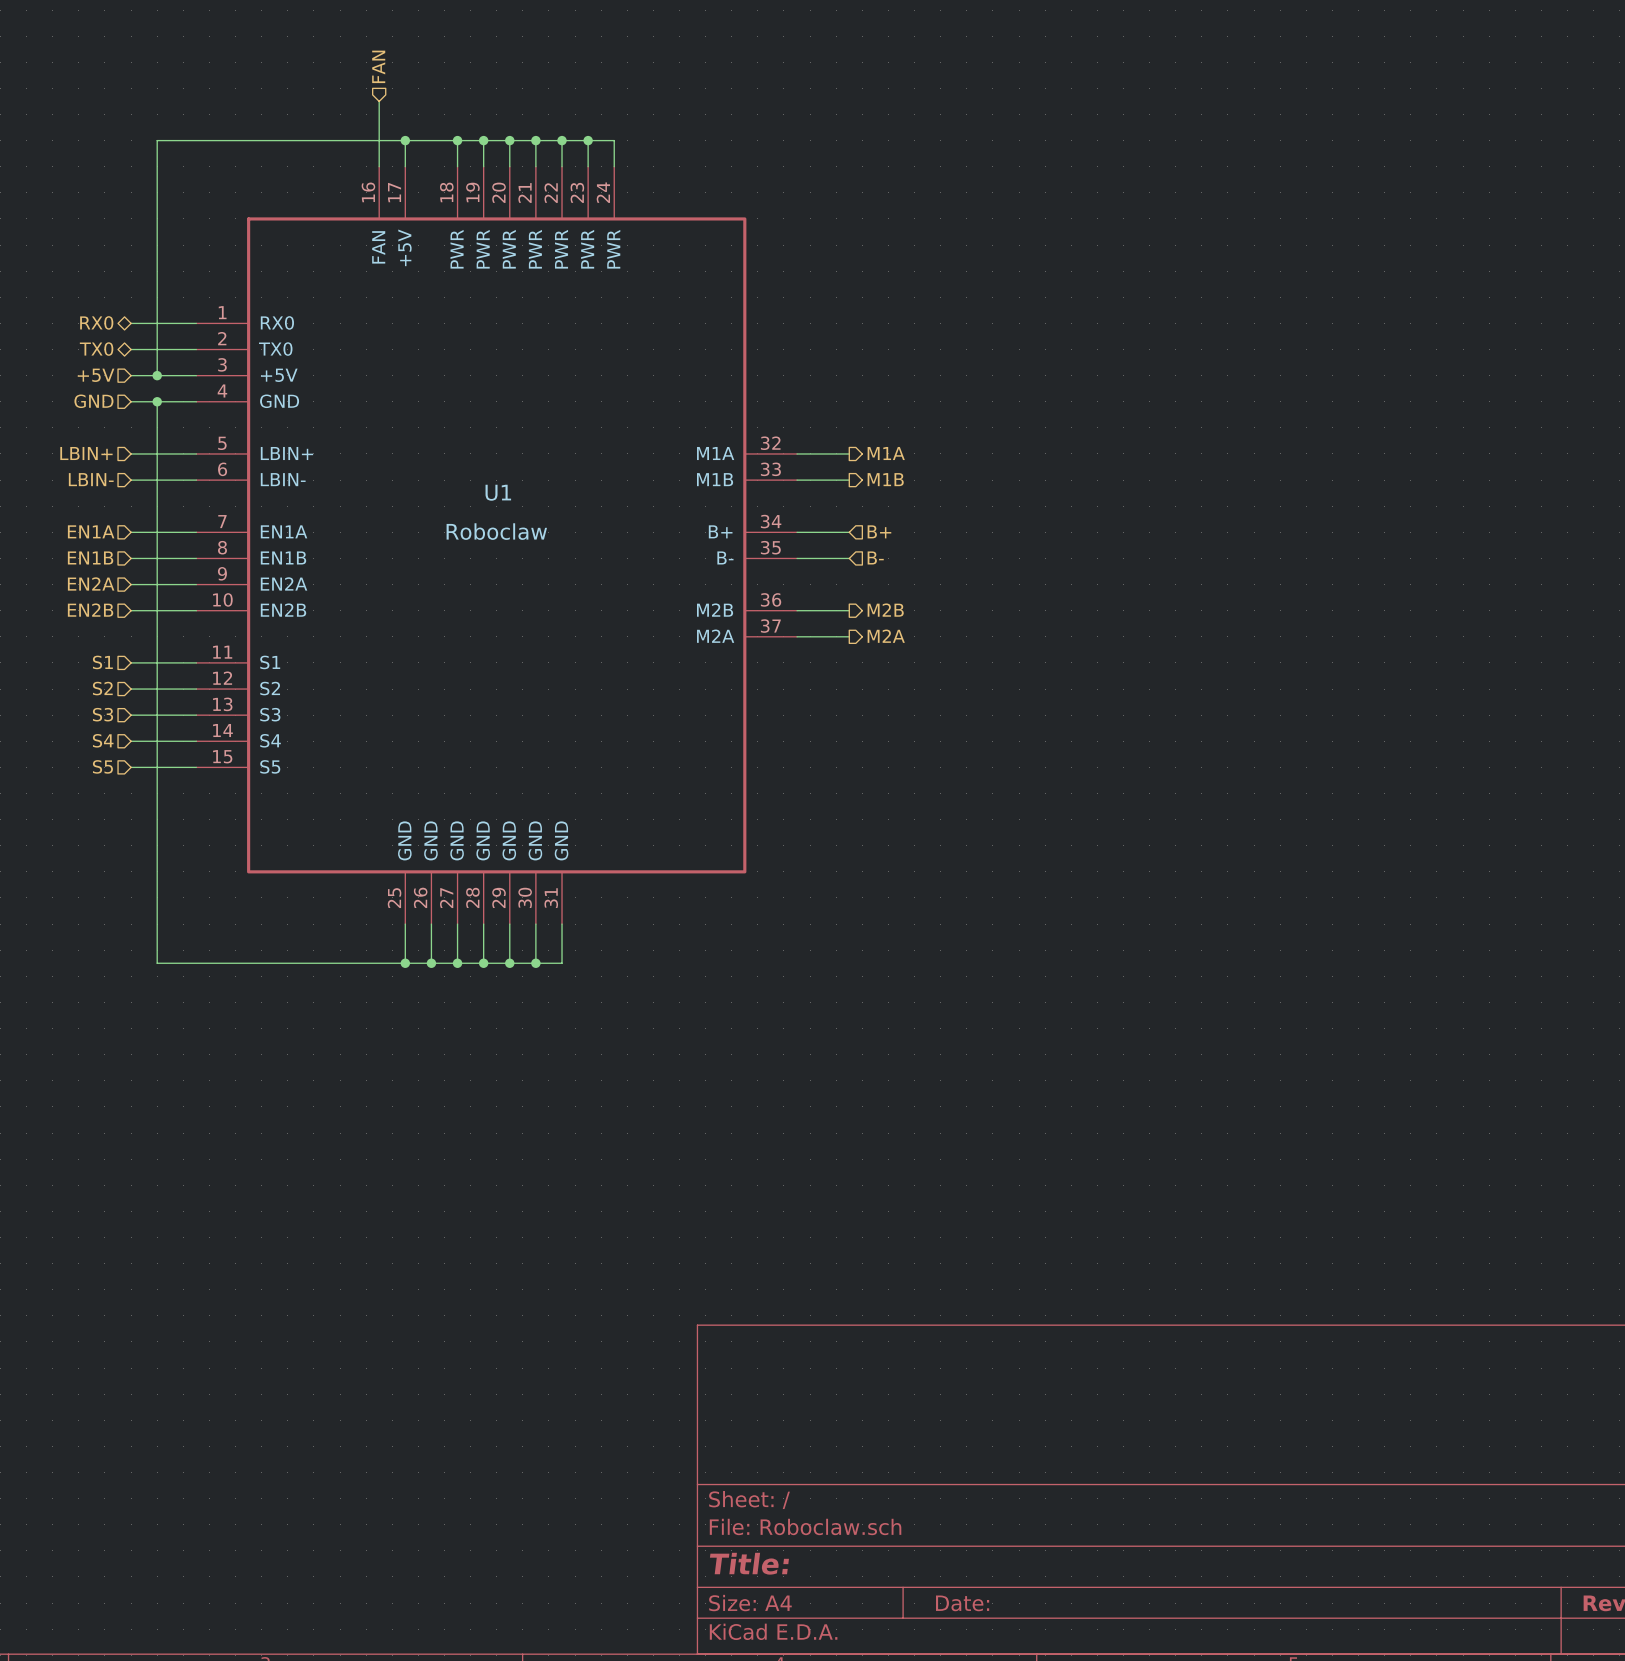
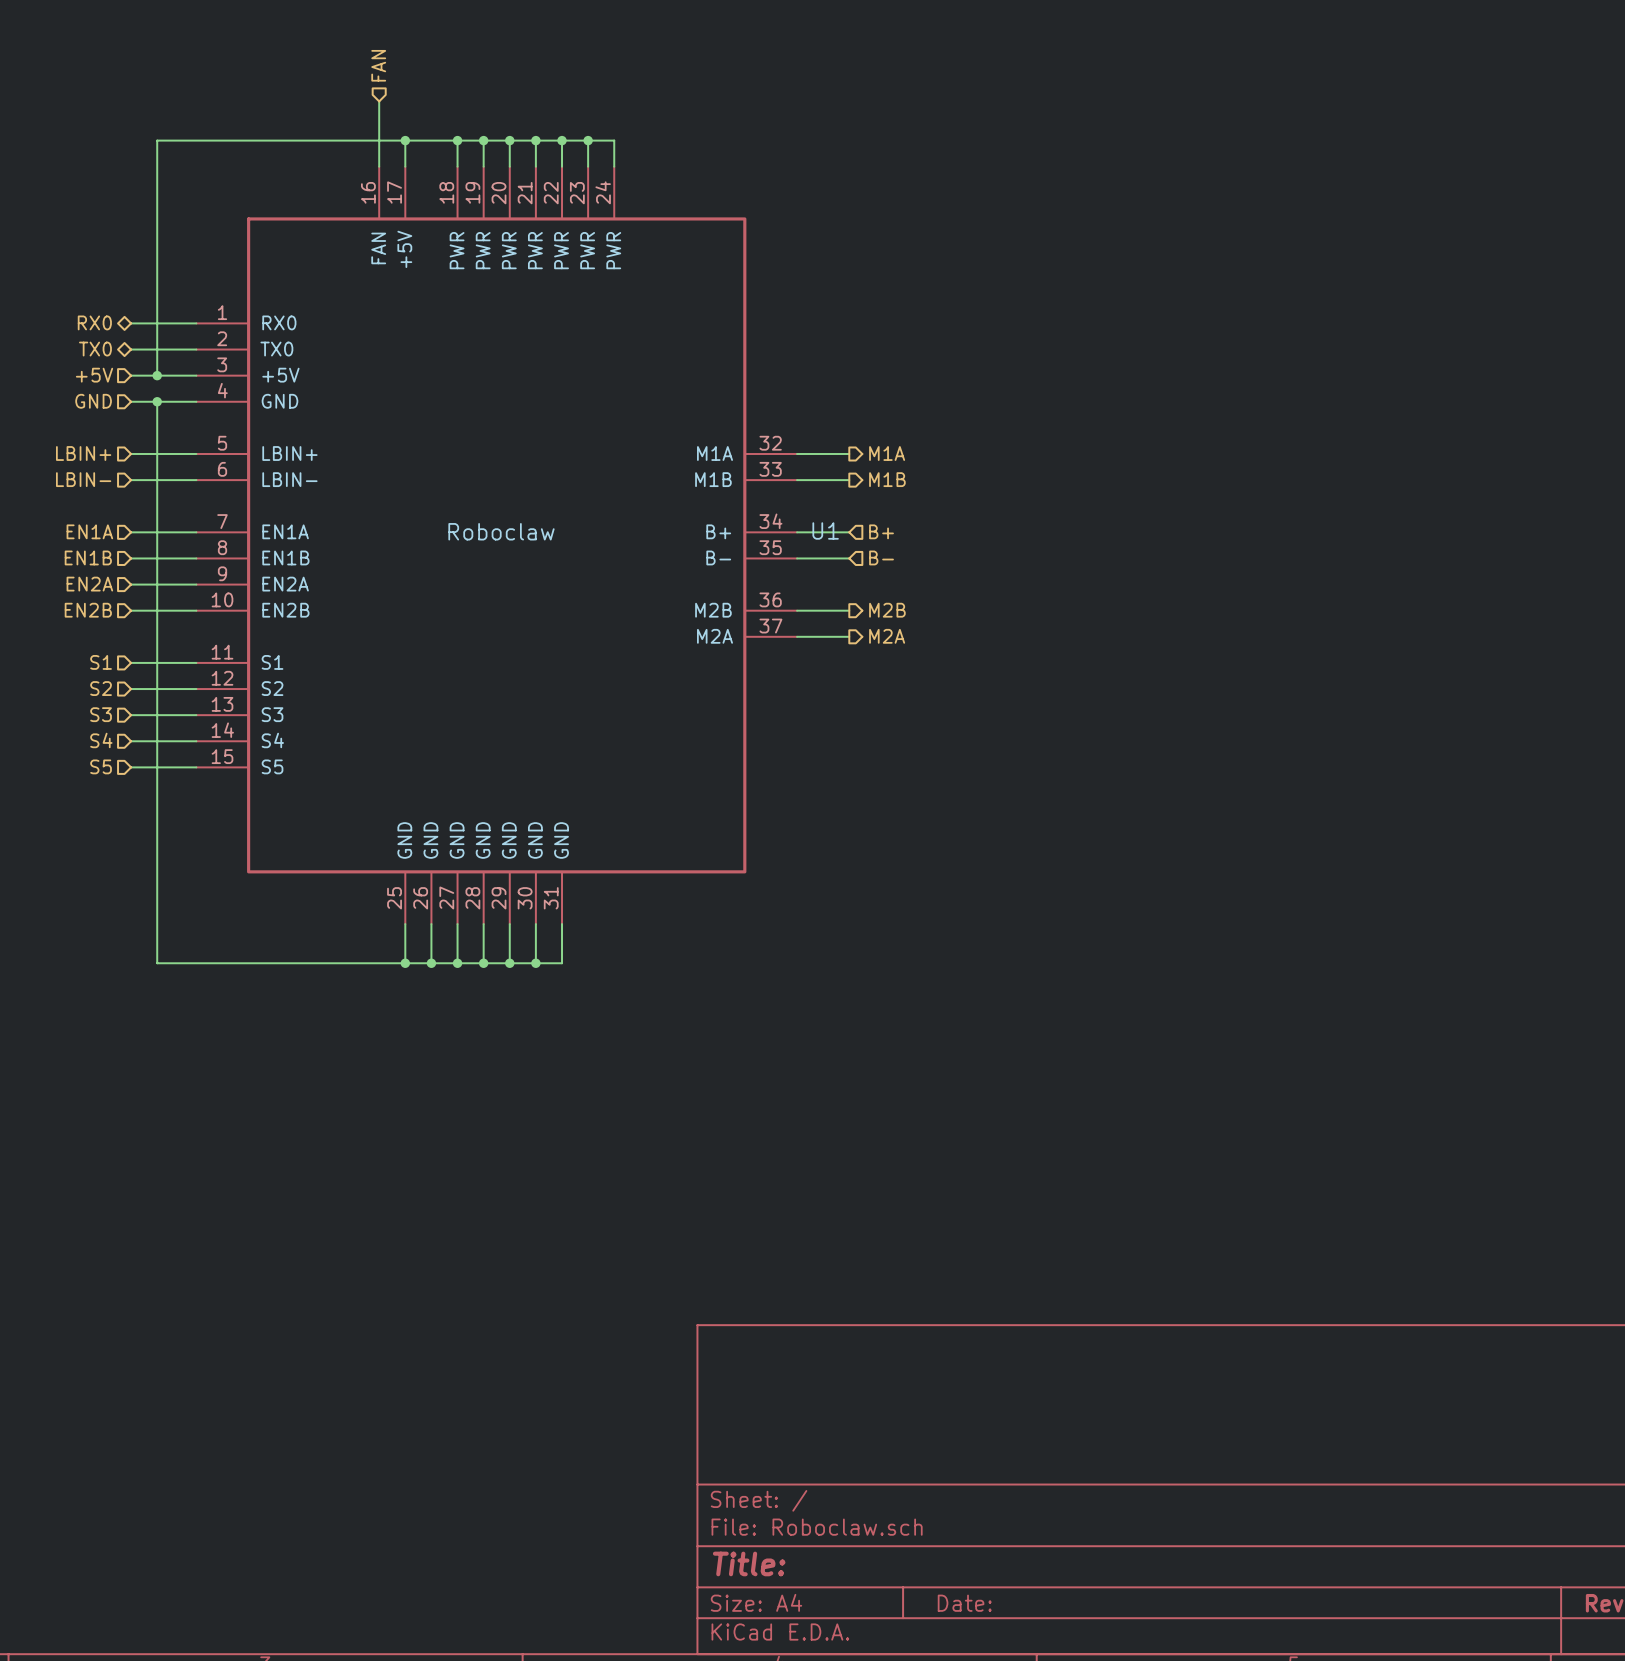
U1 name position: U1 (498, 492) -> U1 (825, 530)

